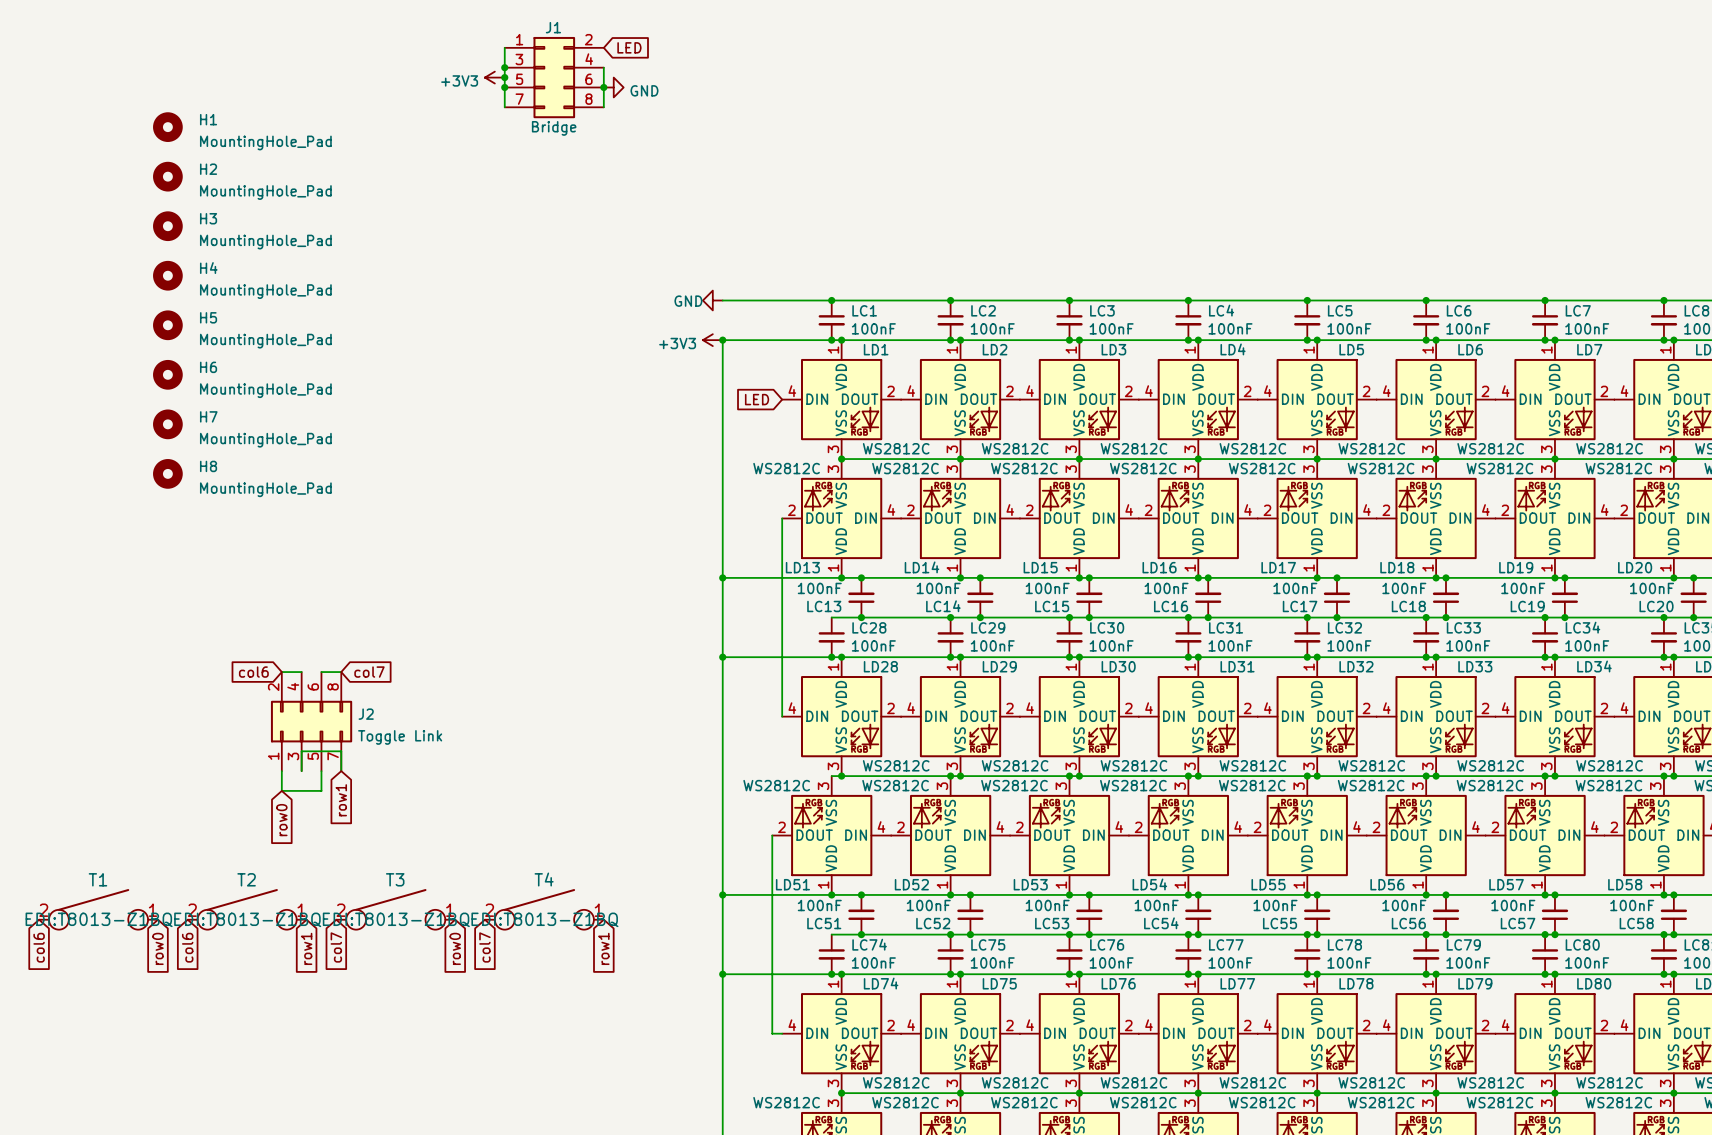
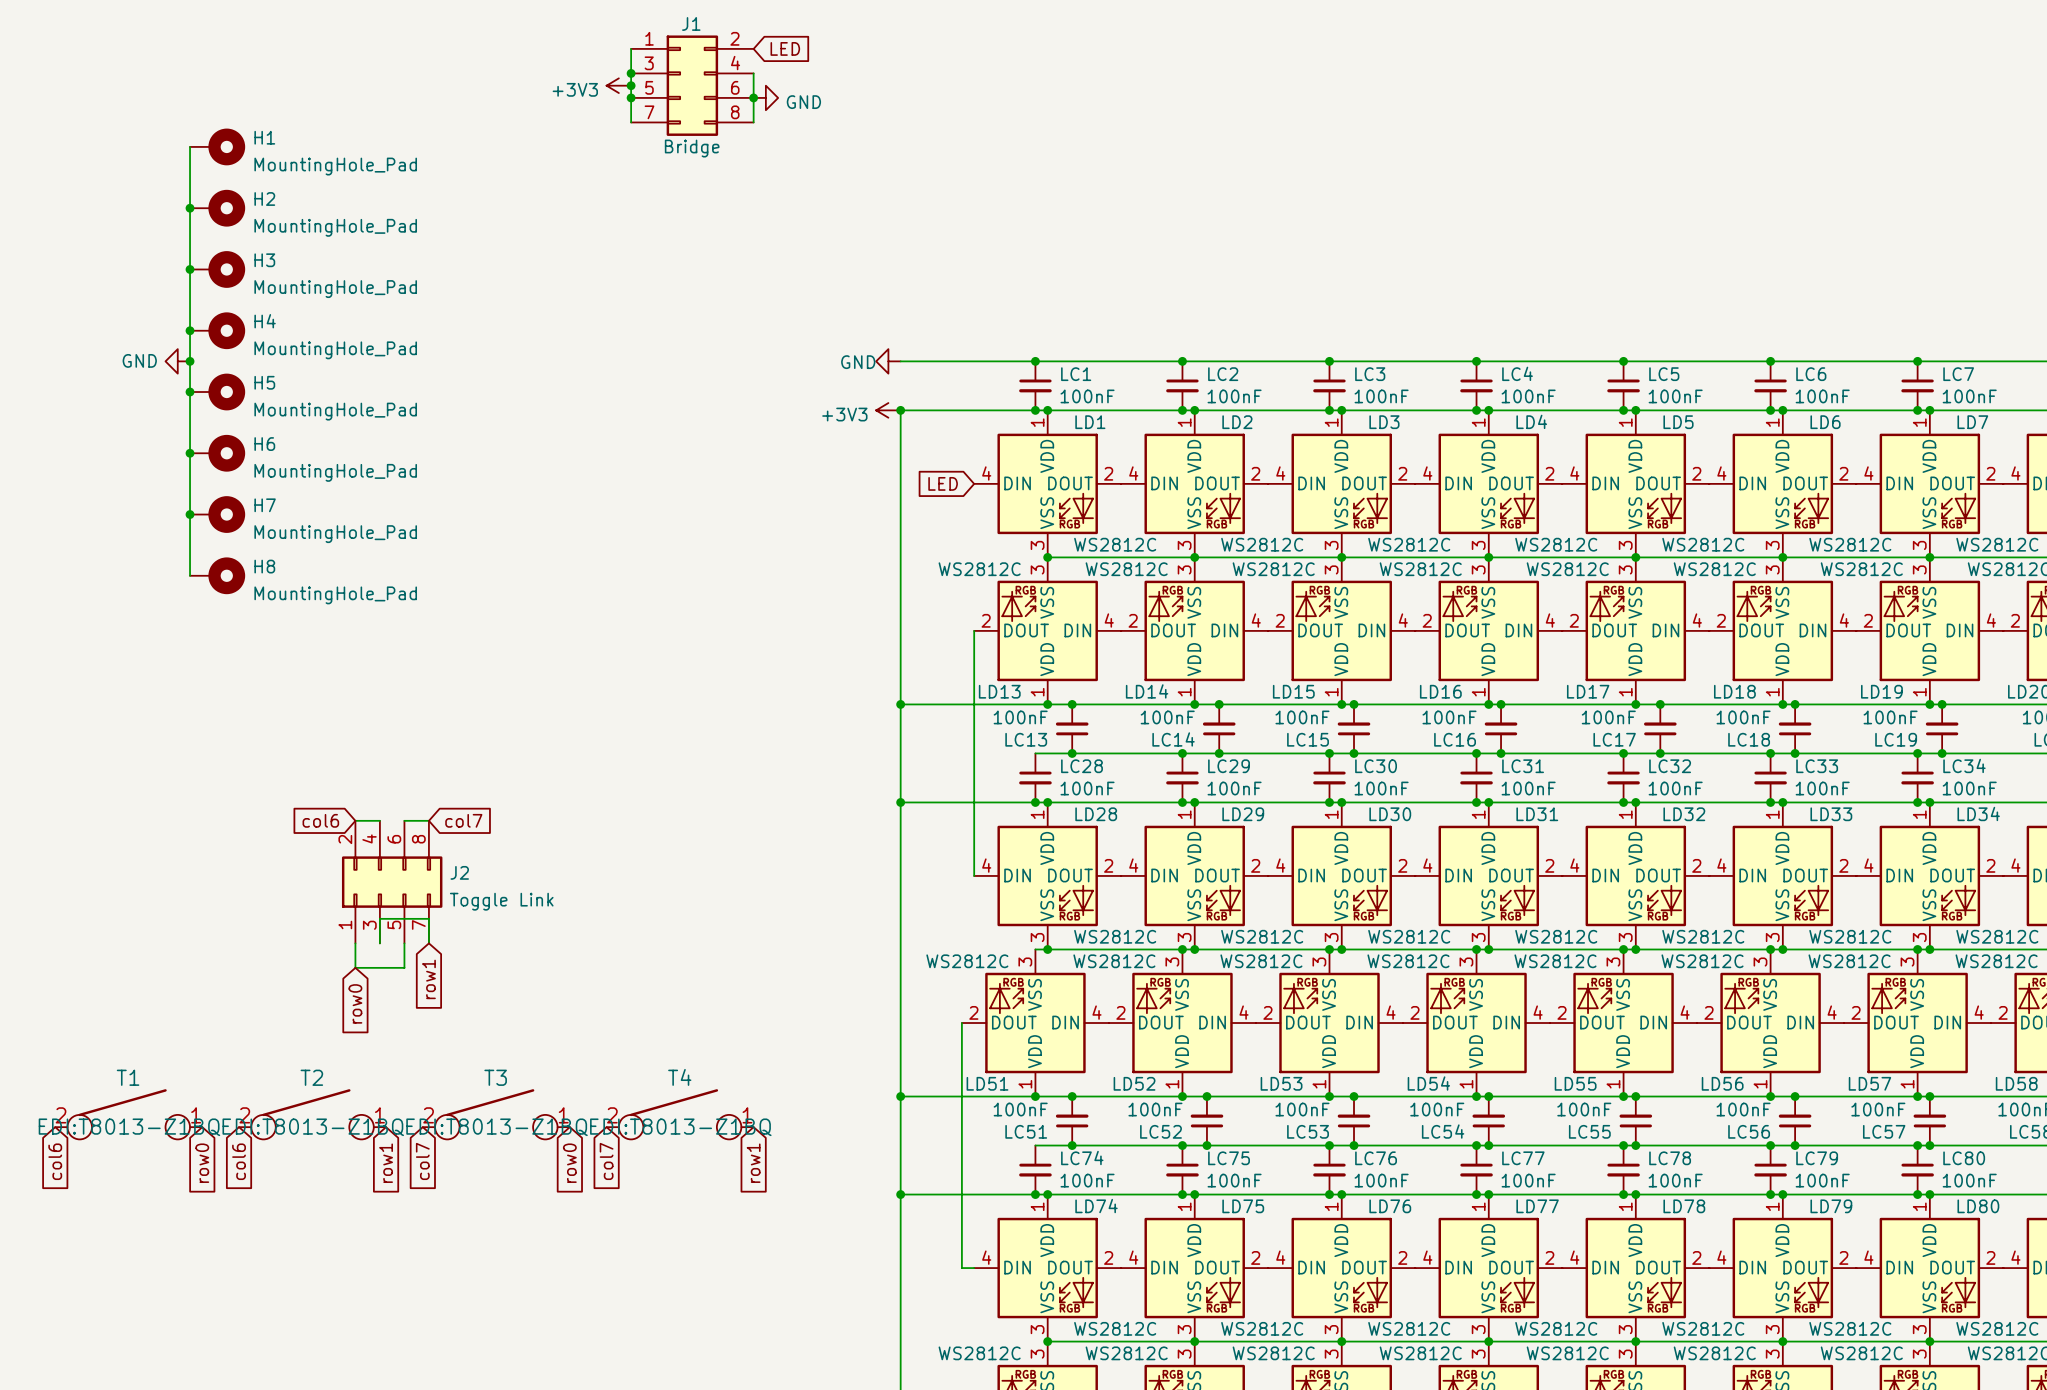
H1 symbol: [153, 112, 183, 142] -> [190, 128, 246, 166]
wire: none -> (190, 146) (190, 575)
H2 symbol: [153, 161, 183, 192] -> [190, 189, 246, 227]
junction: none -> (190, 208)
H3 symbol: [153, 211, 183, 242] -> [190, 251, 246, 288]
junction: none -> (190, 269)
H4 symbol: [153, 260, 183, 291] -> [190, 312, 246, 350]
junction: none -> (190, 330)
power symbol: none -> GND (177, 361)
junction: none -> (190, 361)
H5 symbol: [153, 310, 183, 341] -> [190, 373, 246, 411]
junction: none -> (190, 392)
H6 symbol: [153, 359, 183, 390] -> [190, 434, 246, 472]
junction: none -> (190, 453)
H7 symbol: [153, 409, 183, 440] -> [190, 496, 246, 533]
junction: none -> (190, 514)
H8 symbol: [153, 459, 183, 489] -> [190, 557, 246, 595]

